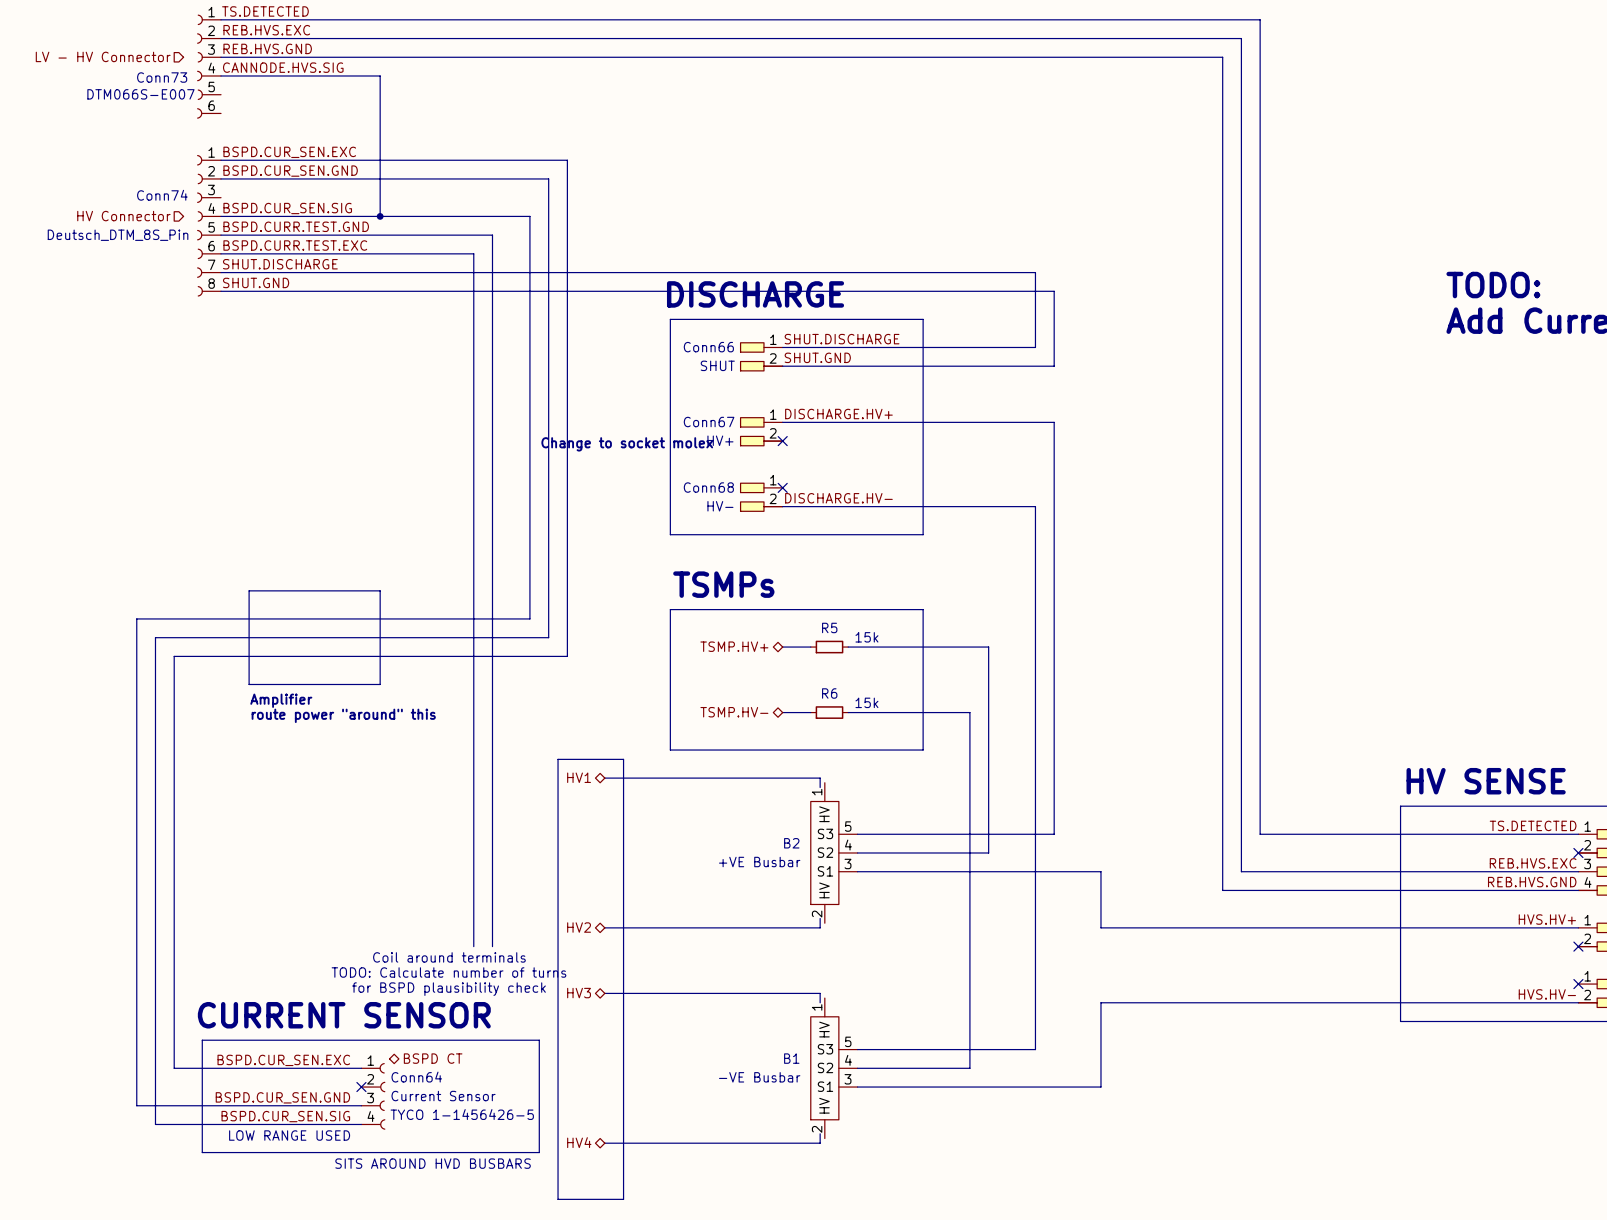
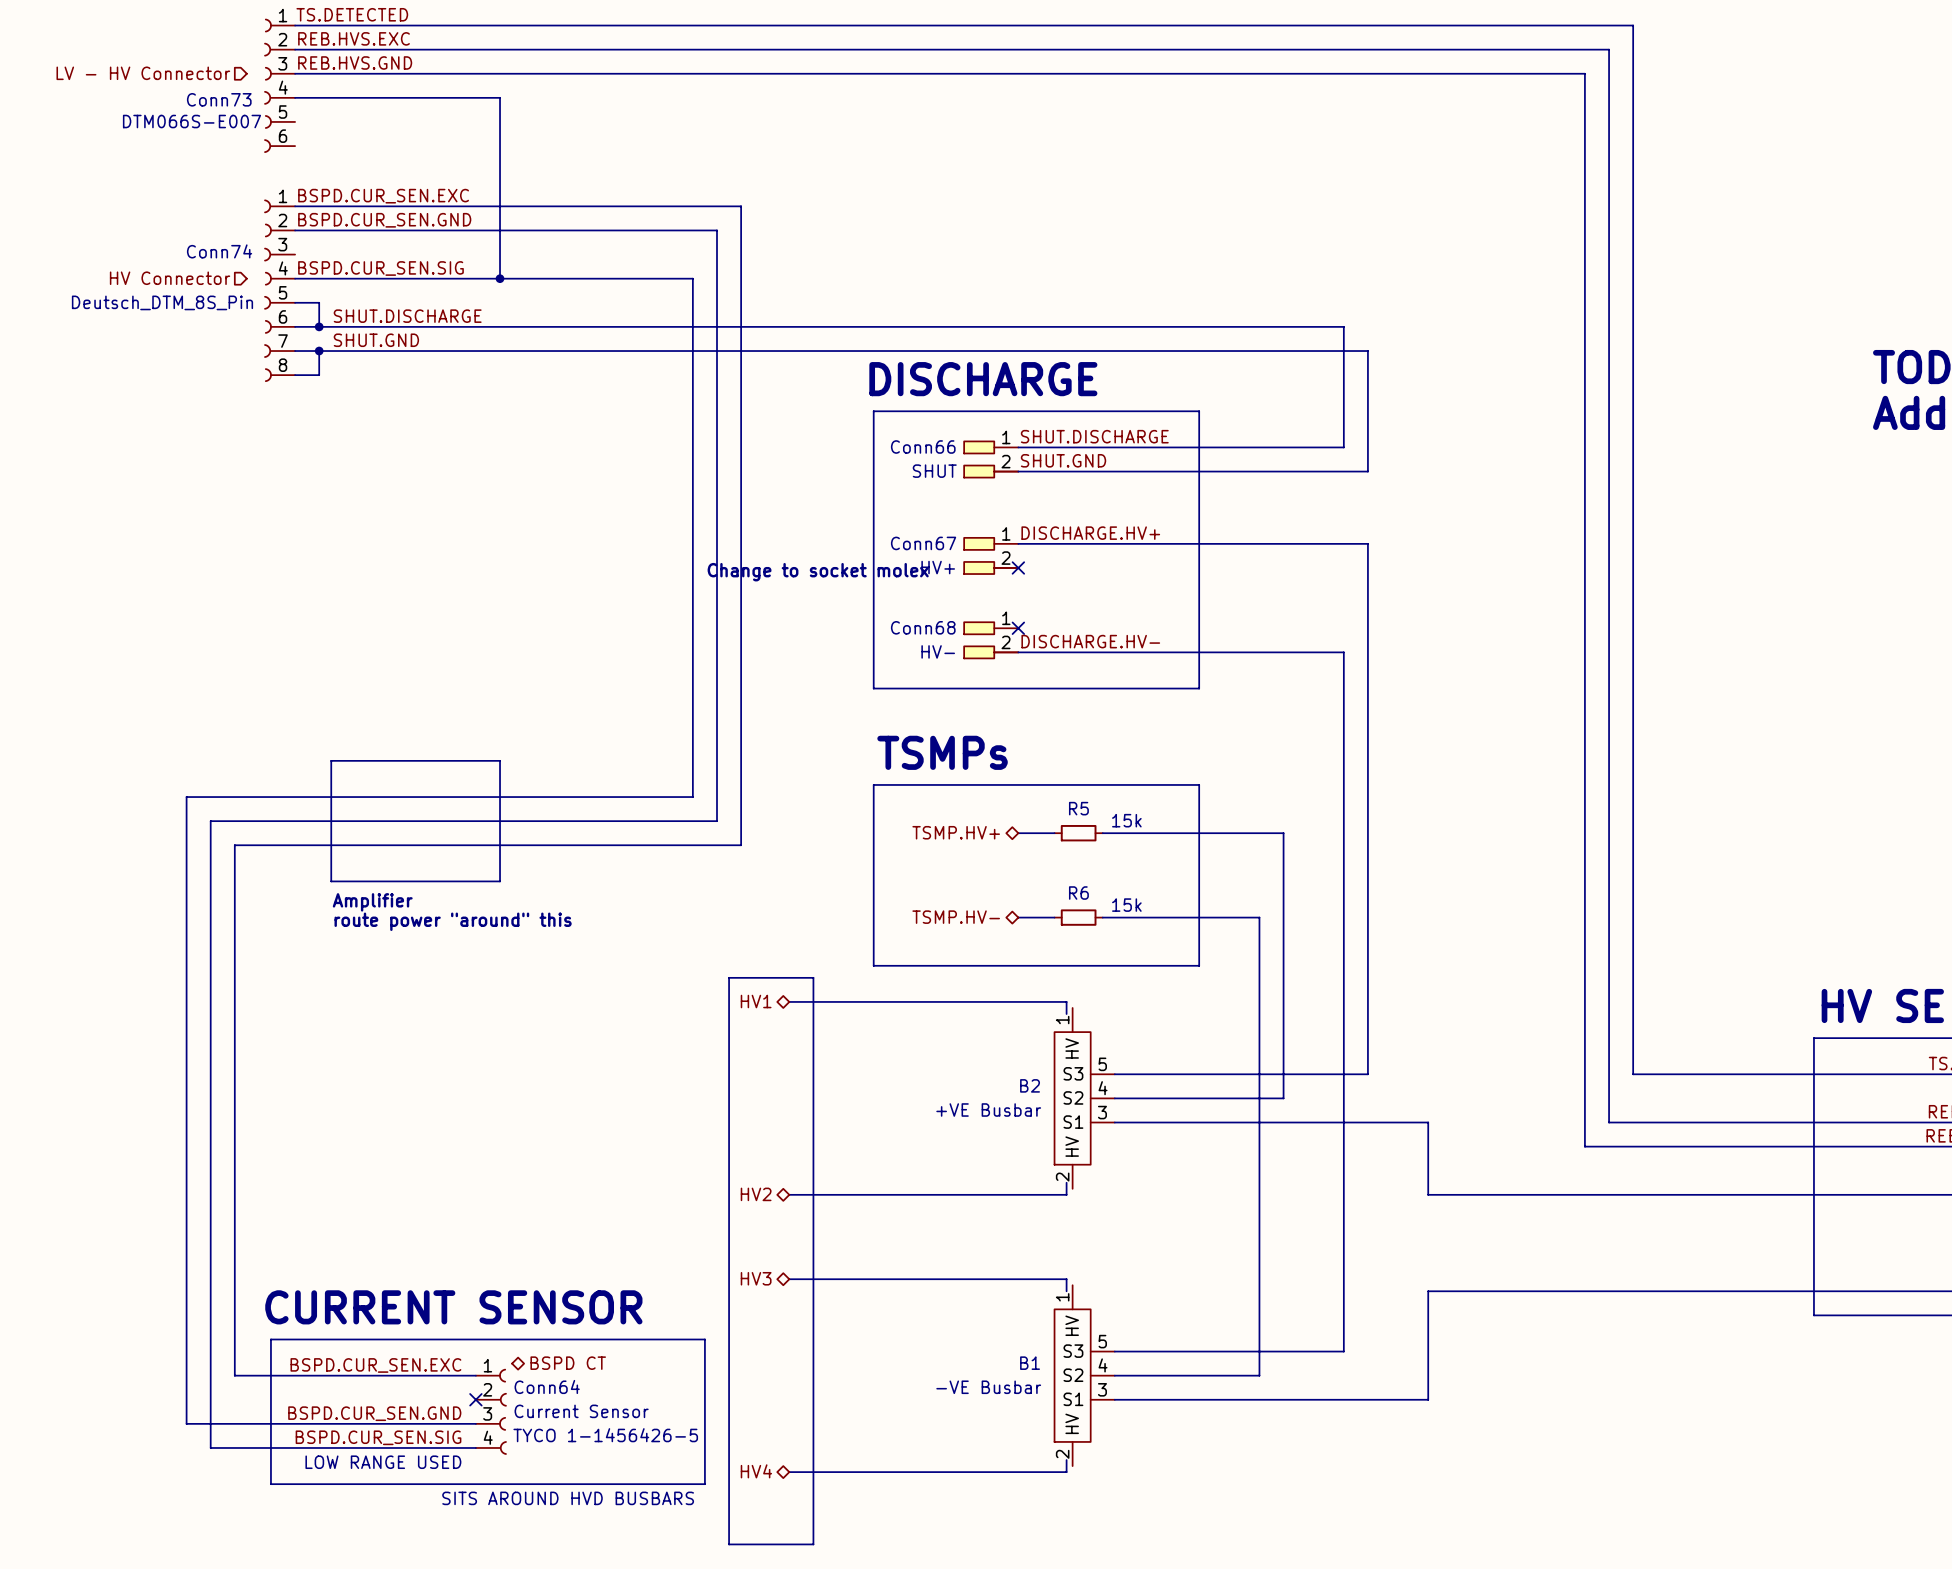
label: CANNODE.HVS.SIG (283, 67) -> none
label: BSPD.CURR.TEST.GND (296, 226) -> none
wire: (239, 235) (492, 235) (492, 946) -> (319, 302) (319, 326)
label: BSPD.CURR.TEST.EXC (295, 245) -> none
junction: none -> (319, 326)
wire: (473, 253) (473, 946) -> none
label position: SHUT.DISCHARGE (280, 264) -> SHUT.DISCHARGE (407, 316)
wire: none -> (319, 351) (319, 375)
junction: none -> (319, 351)
label position: SHUT.GND (256, 282) -> SHUT.GND (376, 340)
wire: (239, 291) (1054, 291) -> (620, 326) (1343, 326) (1343, 351) (1367, 351) (1367, 375)
text: Coil around terminals (449, 957) -> none
text: TODO: Calculate number of turns (448, 972) -> none
text: for BSPD plausibility check (448, 989) -> none

